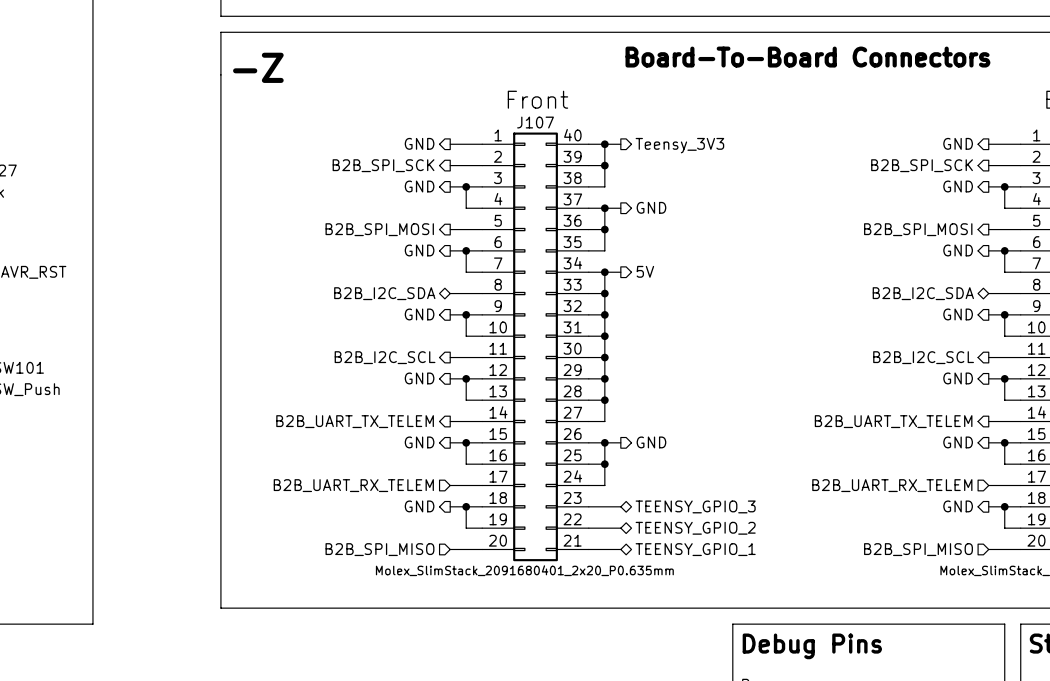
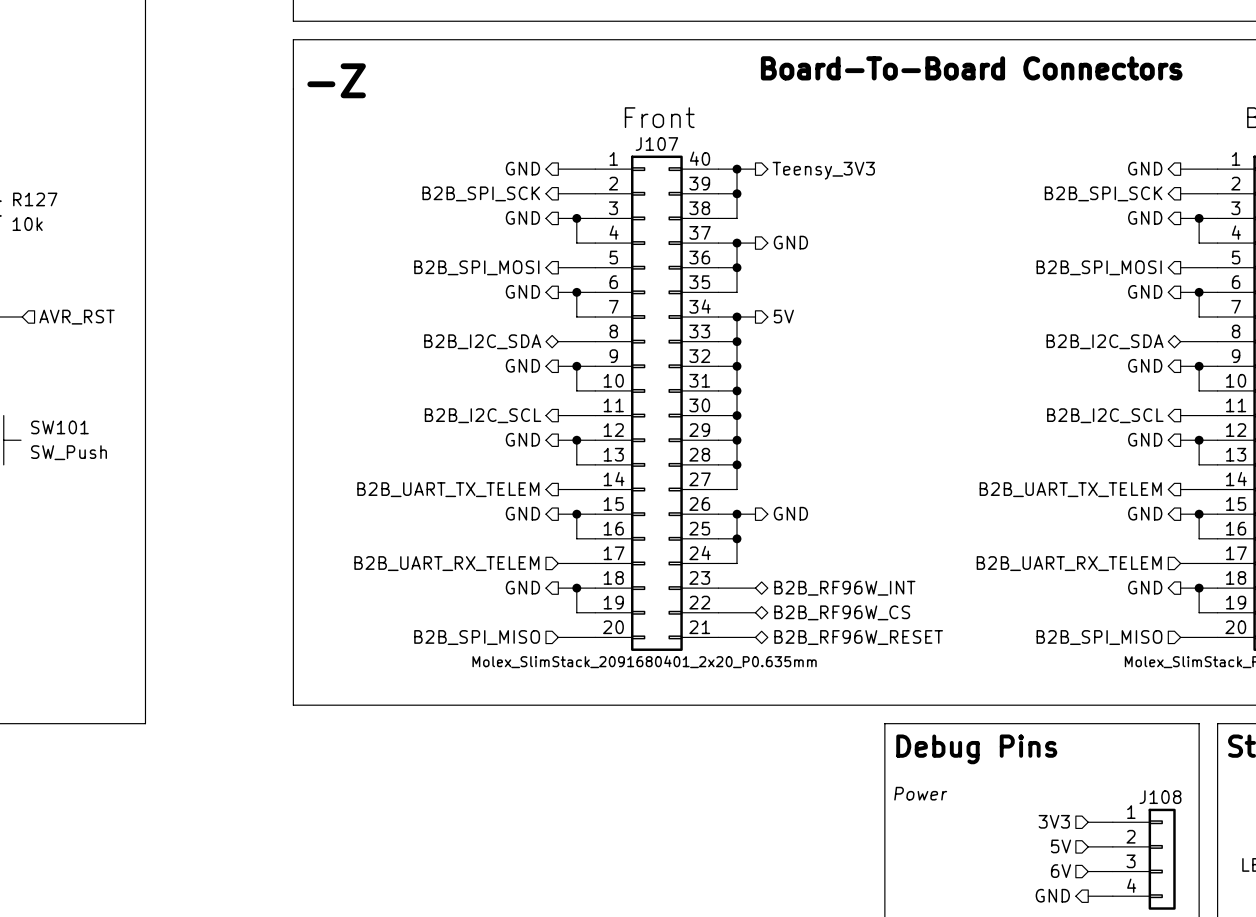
hierarchical label: TEENSY_GPIO_3 (695, 506) -> B2B_RF96W_INT (844, 588)
hierarchical label: TEENSY_GPIO_2 (695, 528) -> B2B_RF96W_CS (842, 612)
hierarchical label: TEENSY_GPIO_1 (695, 549) -> B2B_RF96W_RESET (858, 637)

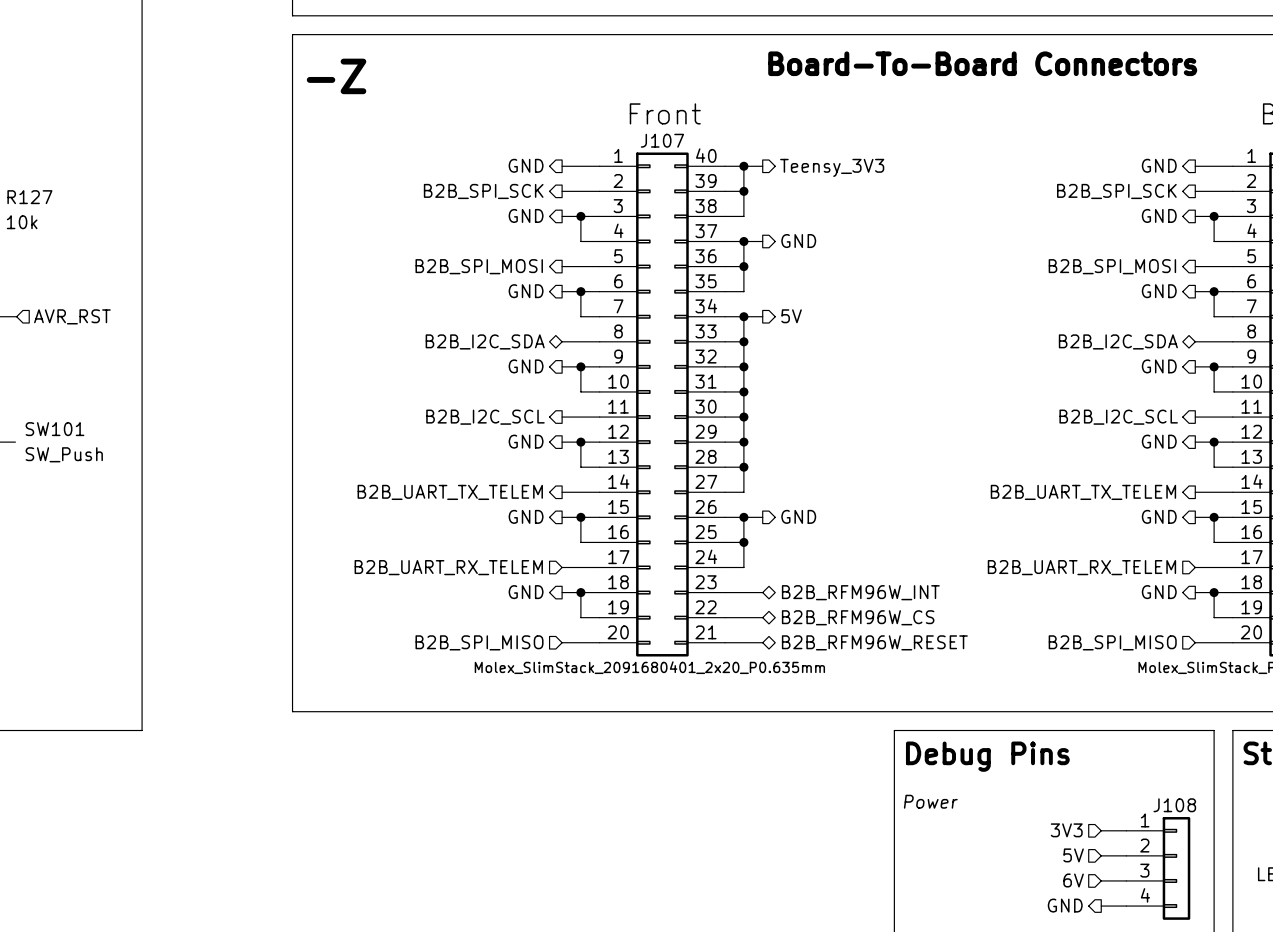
hierarchical label: B2B_RF96W_INT (844, 588) -> B2B_RFM96W_INT (860, 592)
hierarchical label: B2B_RF96W_CS (842, 612) -> B2B_RFM96W_CS (858, 617)
hierarchical label: B2B_RF96W_RESET (858, 637) -> B2B_RFM96W_RESET (874, 642)

